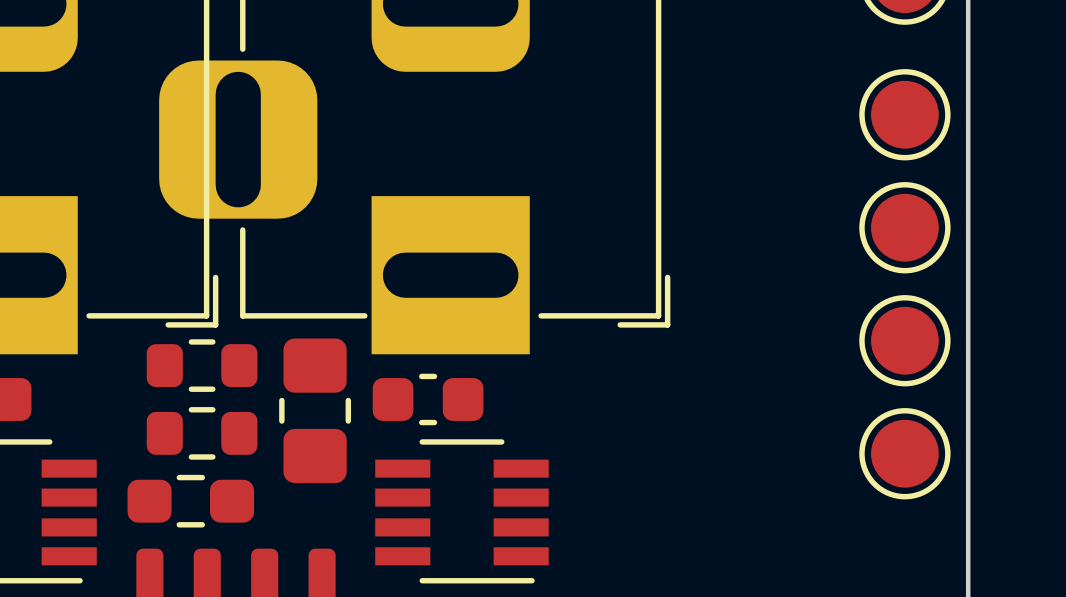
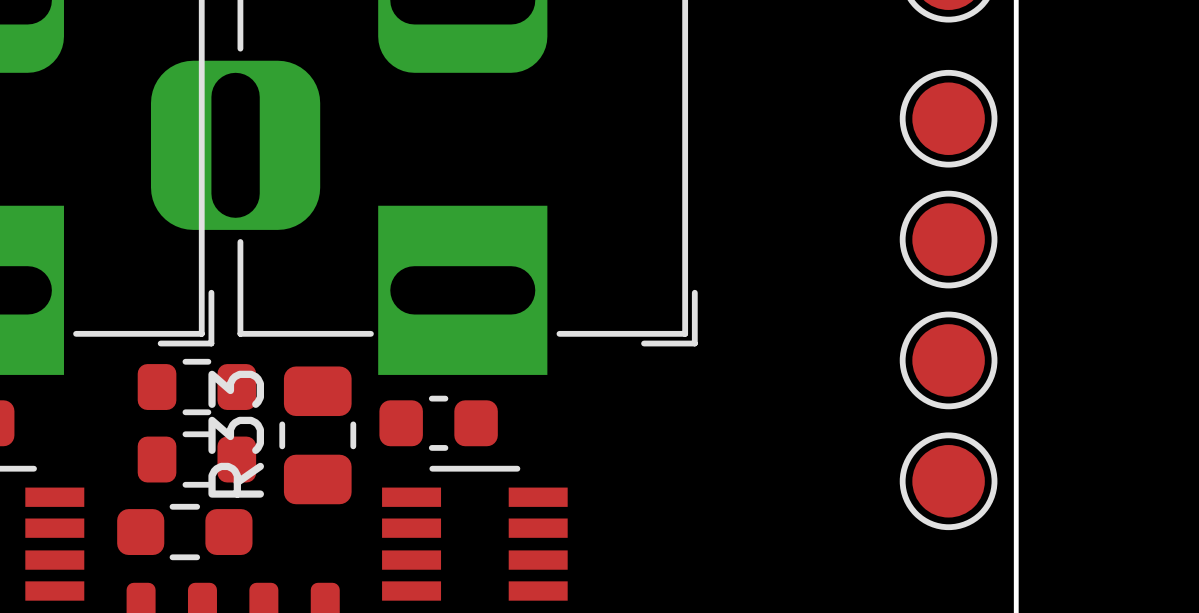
part: (315, 410) -> none
R33: none -> (317, 435)

